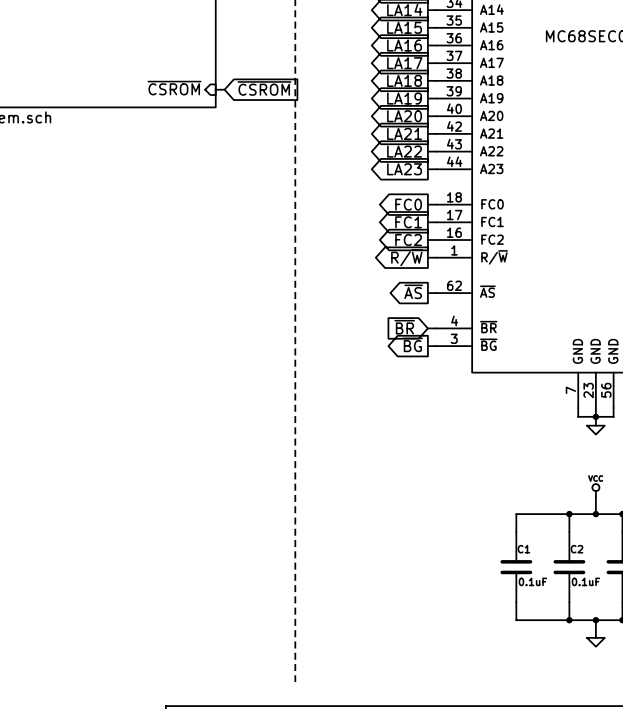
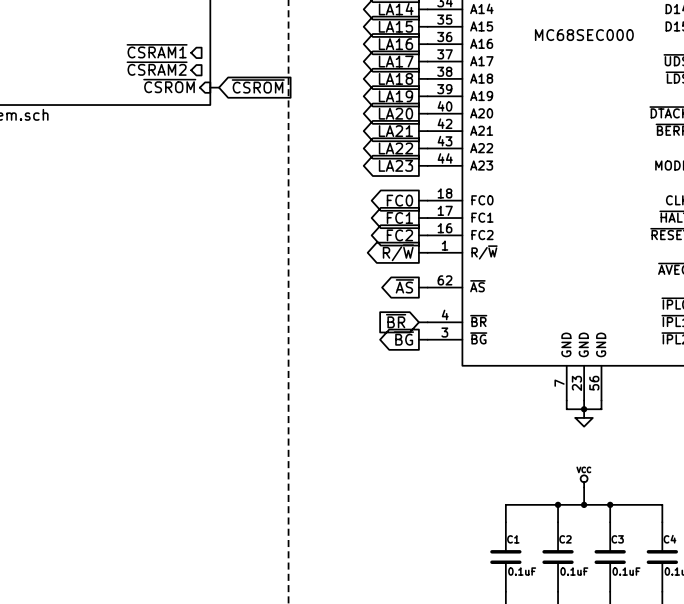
sheet pin: none -> ~{CSRAM1} (157, 51)
sheet pin: none -> ~{CSRAM2} (157, 68)

